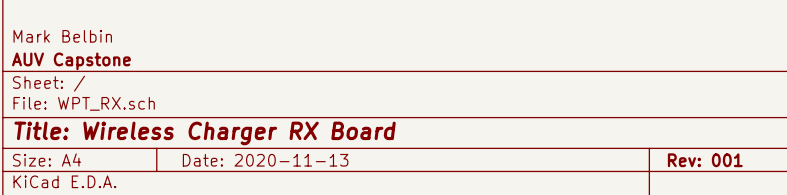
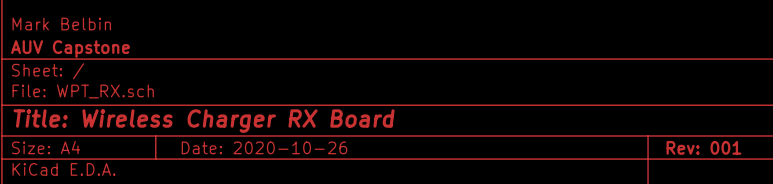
title block: Date: 2020-11-13 (265, 160) -> Date: 2020-10-26 (264, 147)

